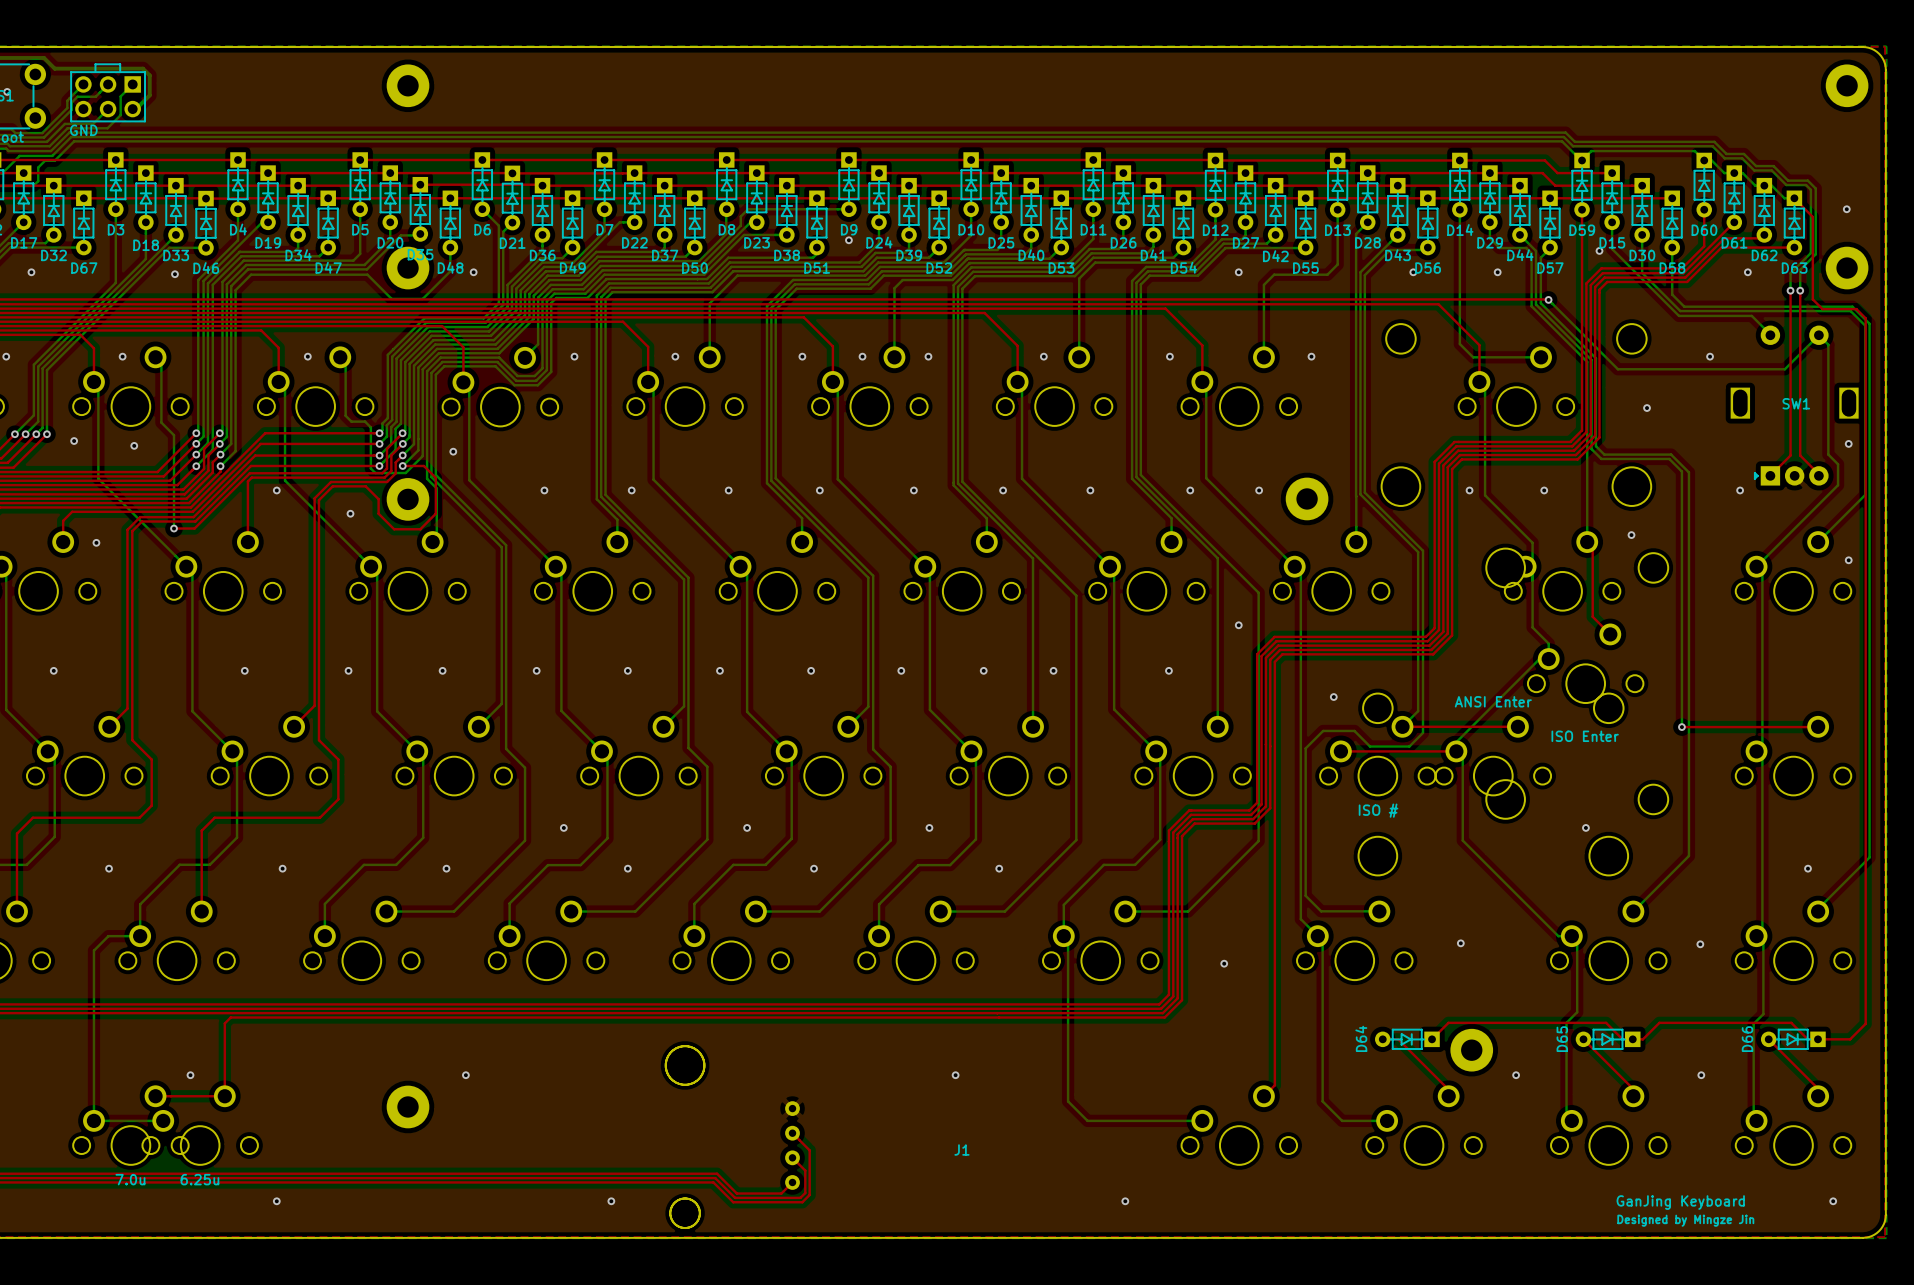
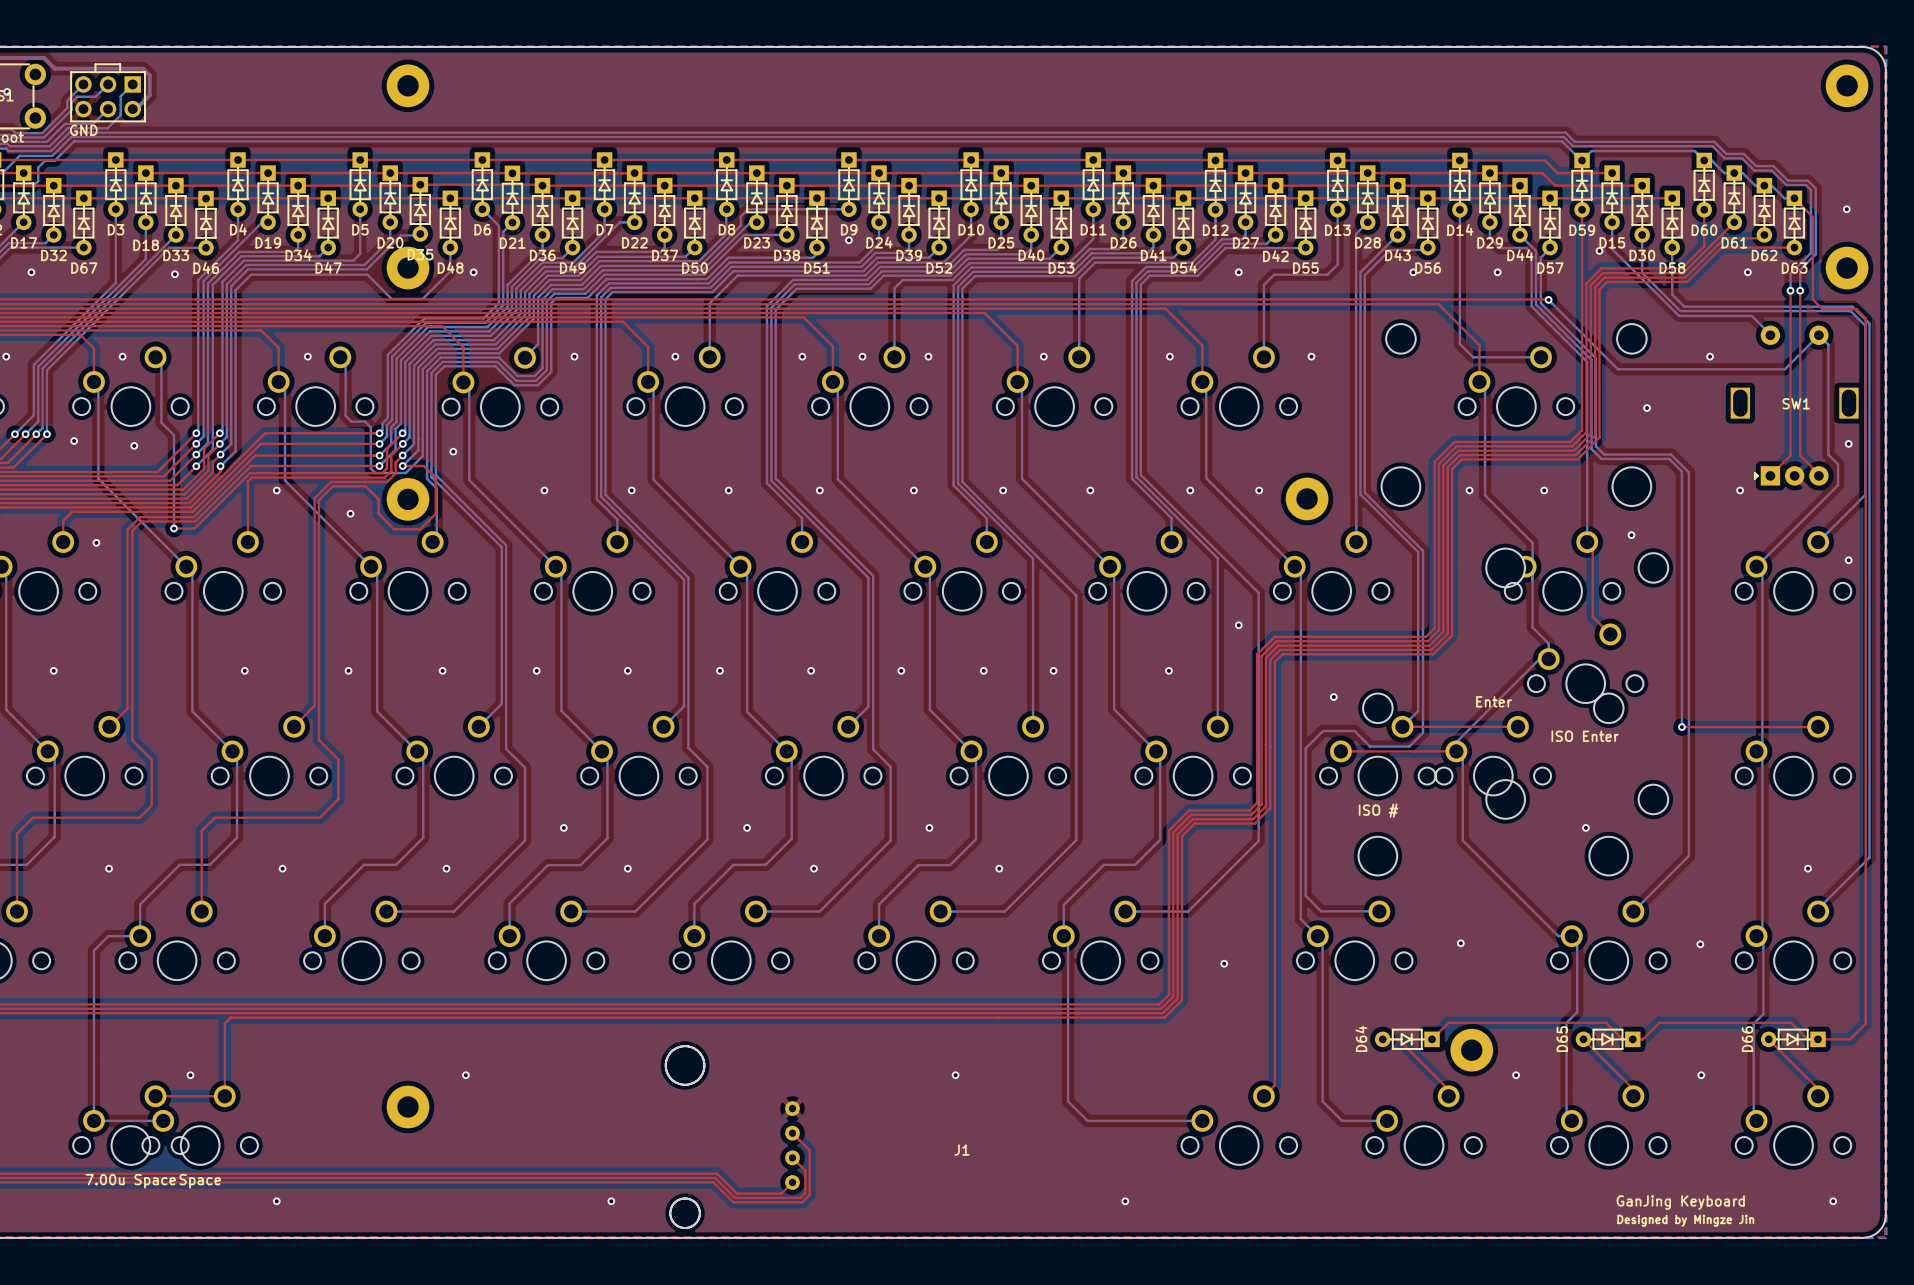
part value: ANSI Enter (1493, 701) -> Enter (1494, 701)
part value: 7.0u (130, 1179) -> 7.00u Space (130, 1181)
part value: 6.25u (199, 1179) -> Space (200, 1181)

